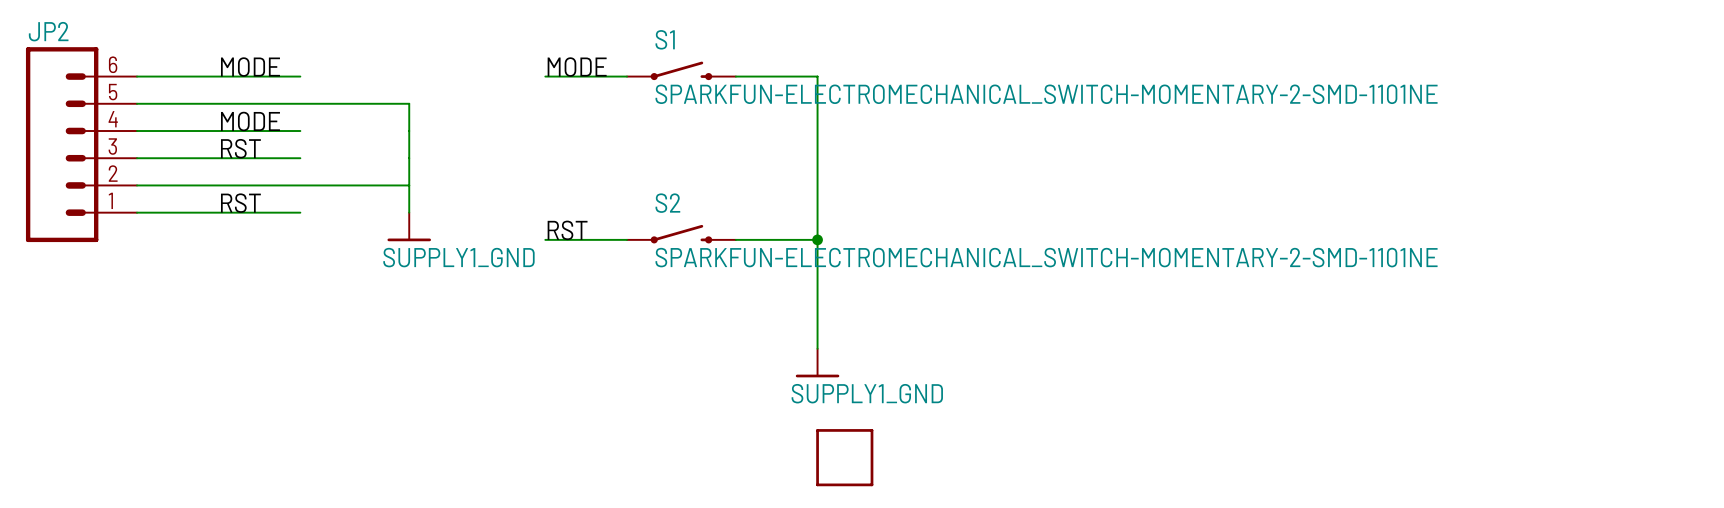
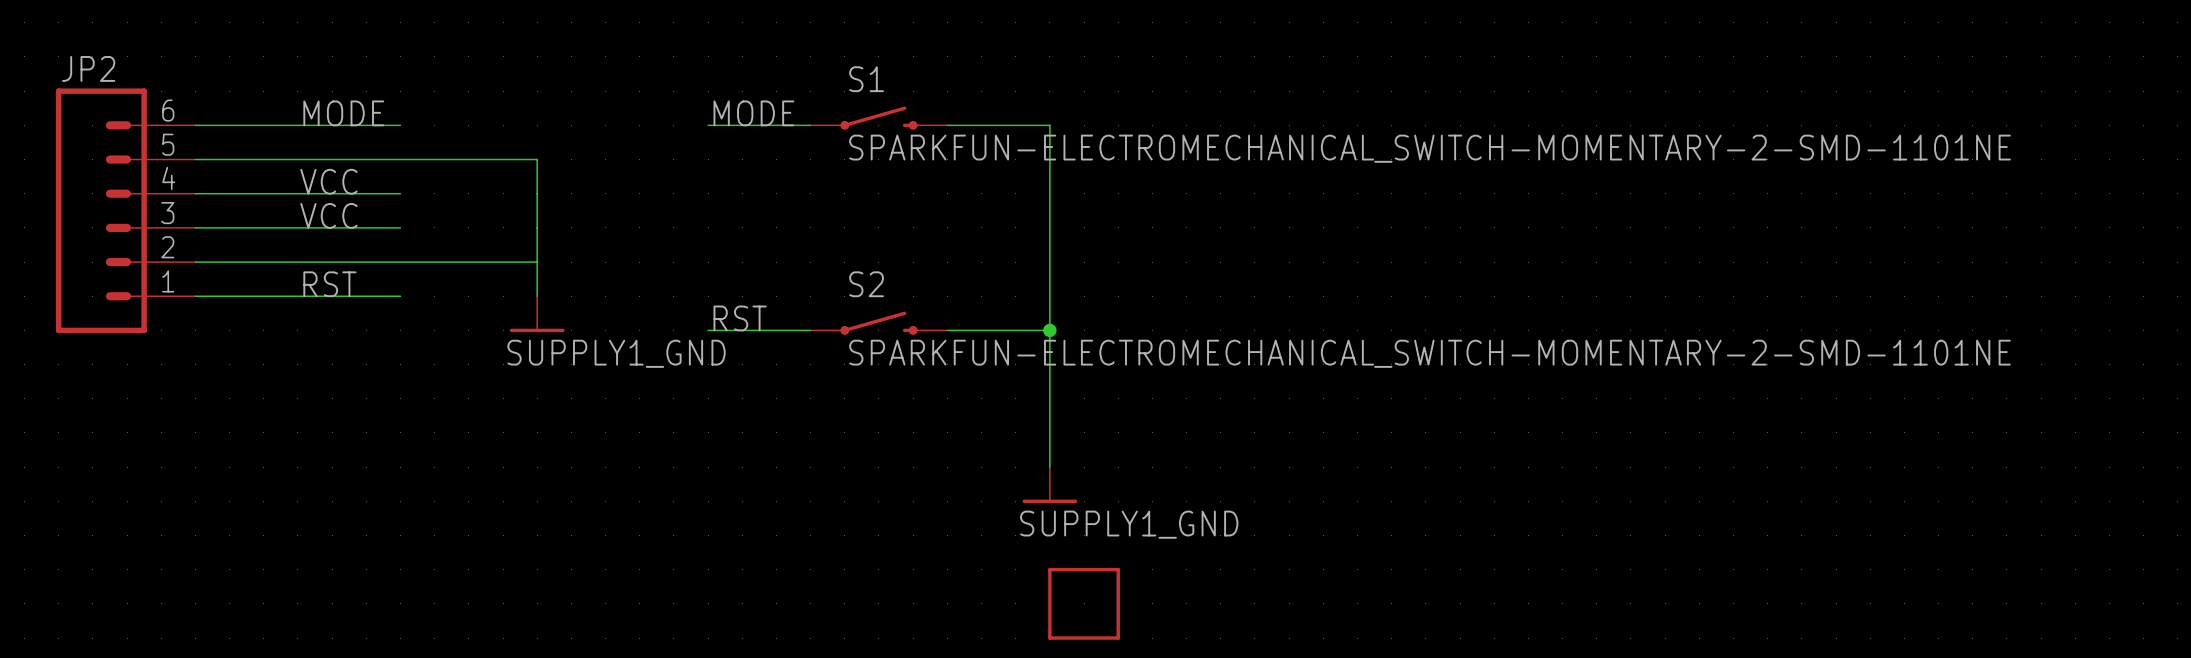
label: MODE (250, 121) -> VCC (328, 181)
label: RST (240, 148) -> VCC (328, 215)

